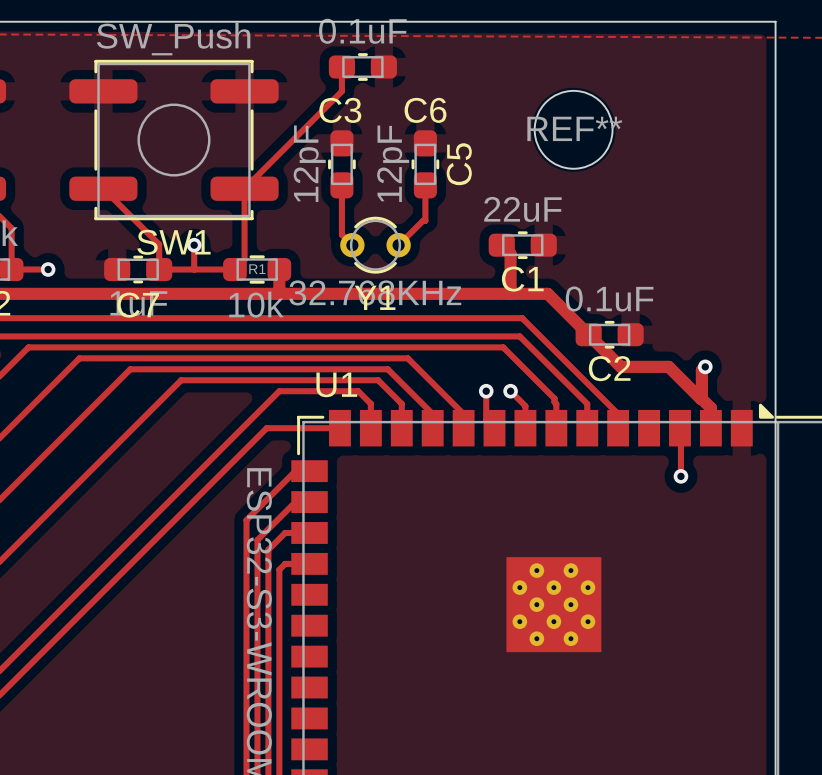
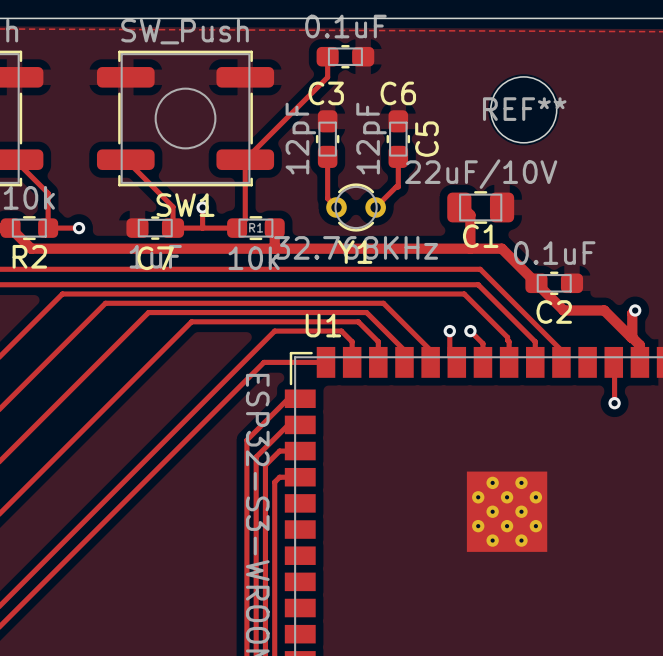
C1 value: 22uF (522, 209) -> 22uF/10V (481, 174)
C1 footprint: [488, 231, 557, 260] -> [447, 191, 515, 224]

